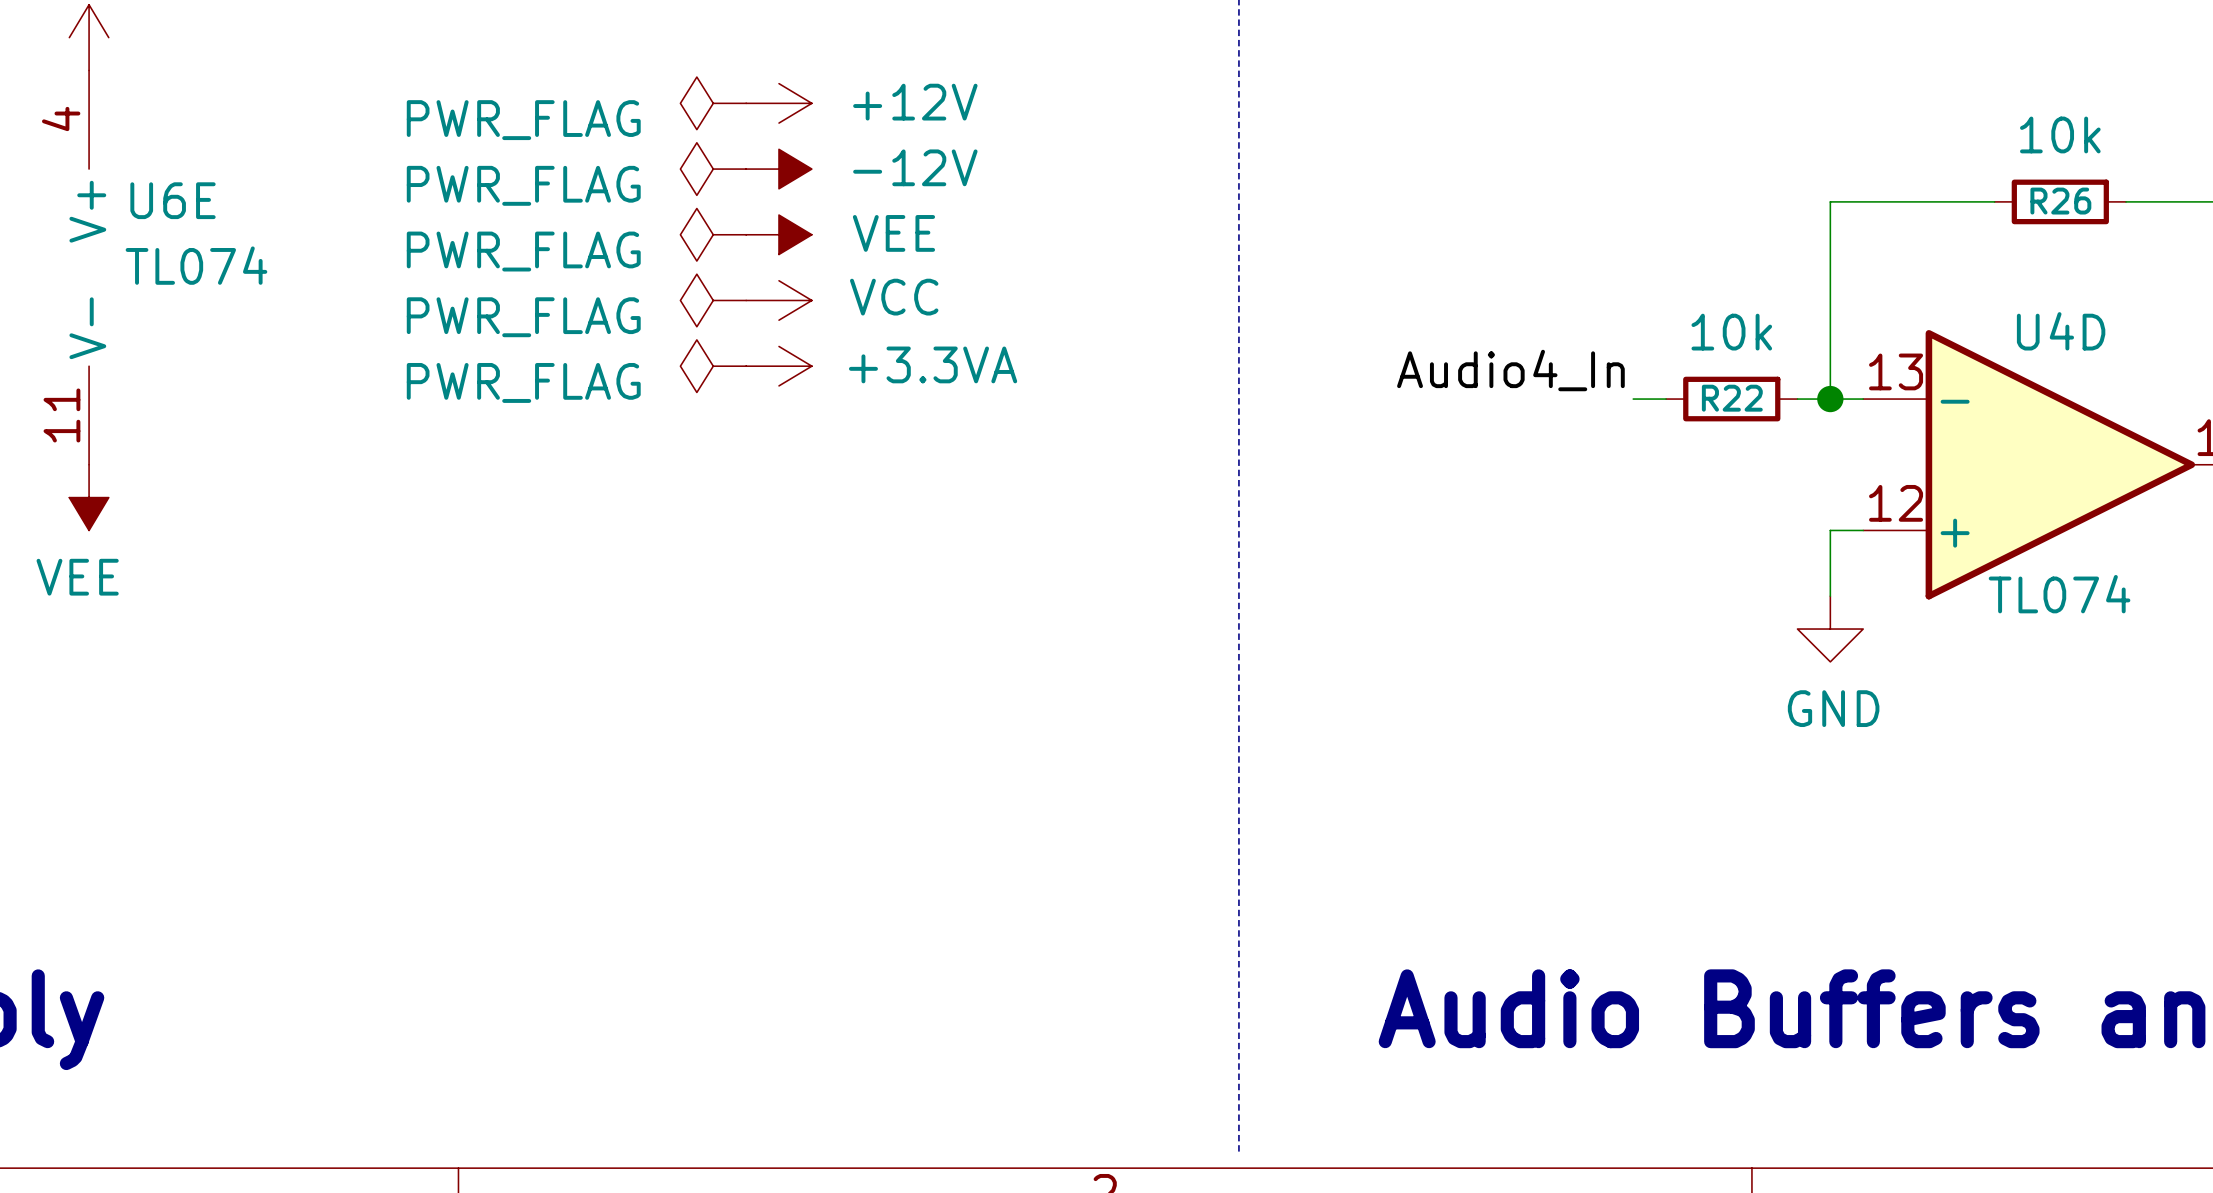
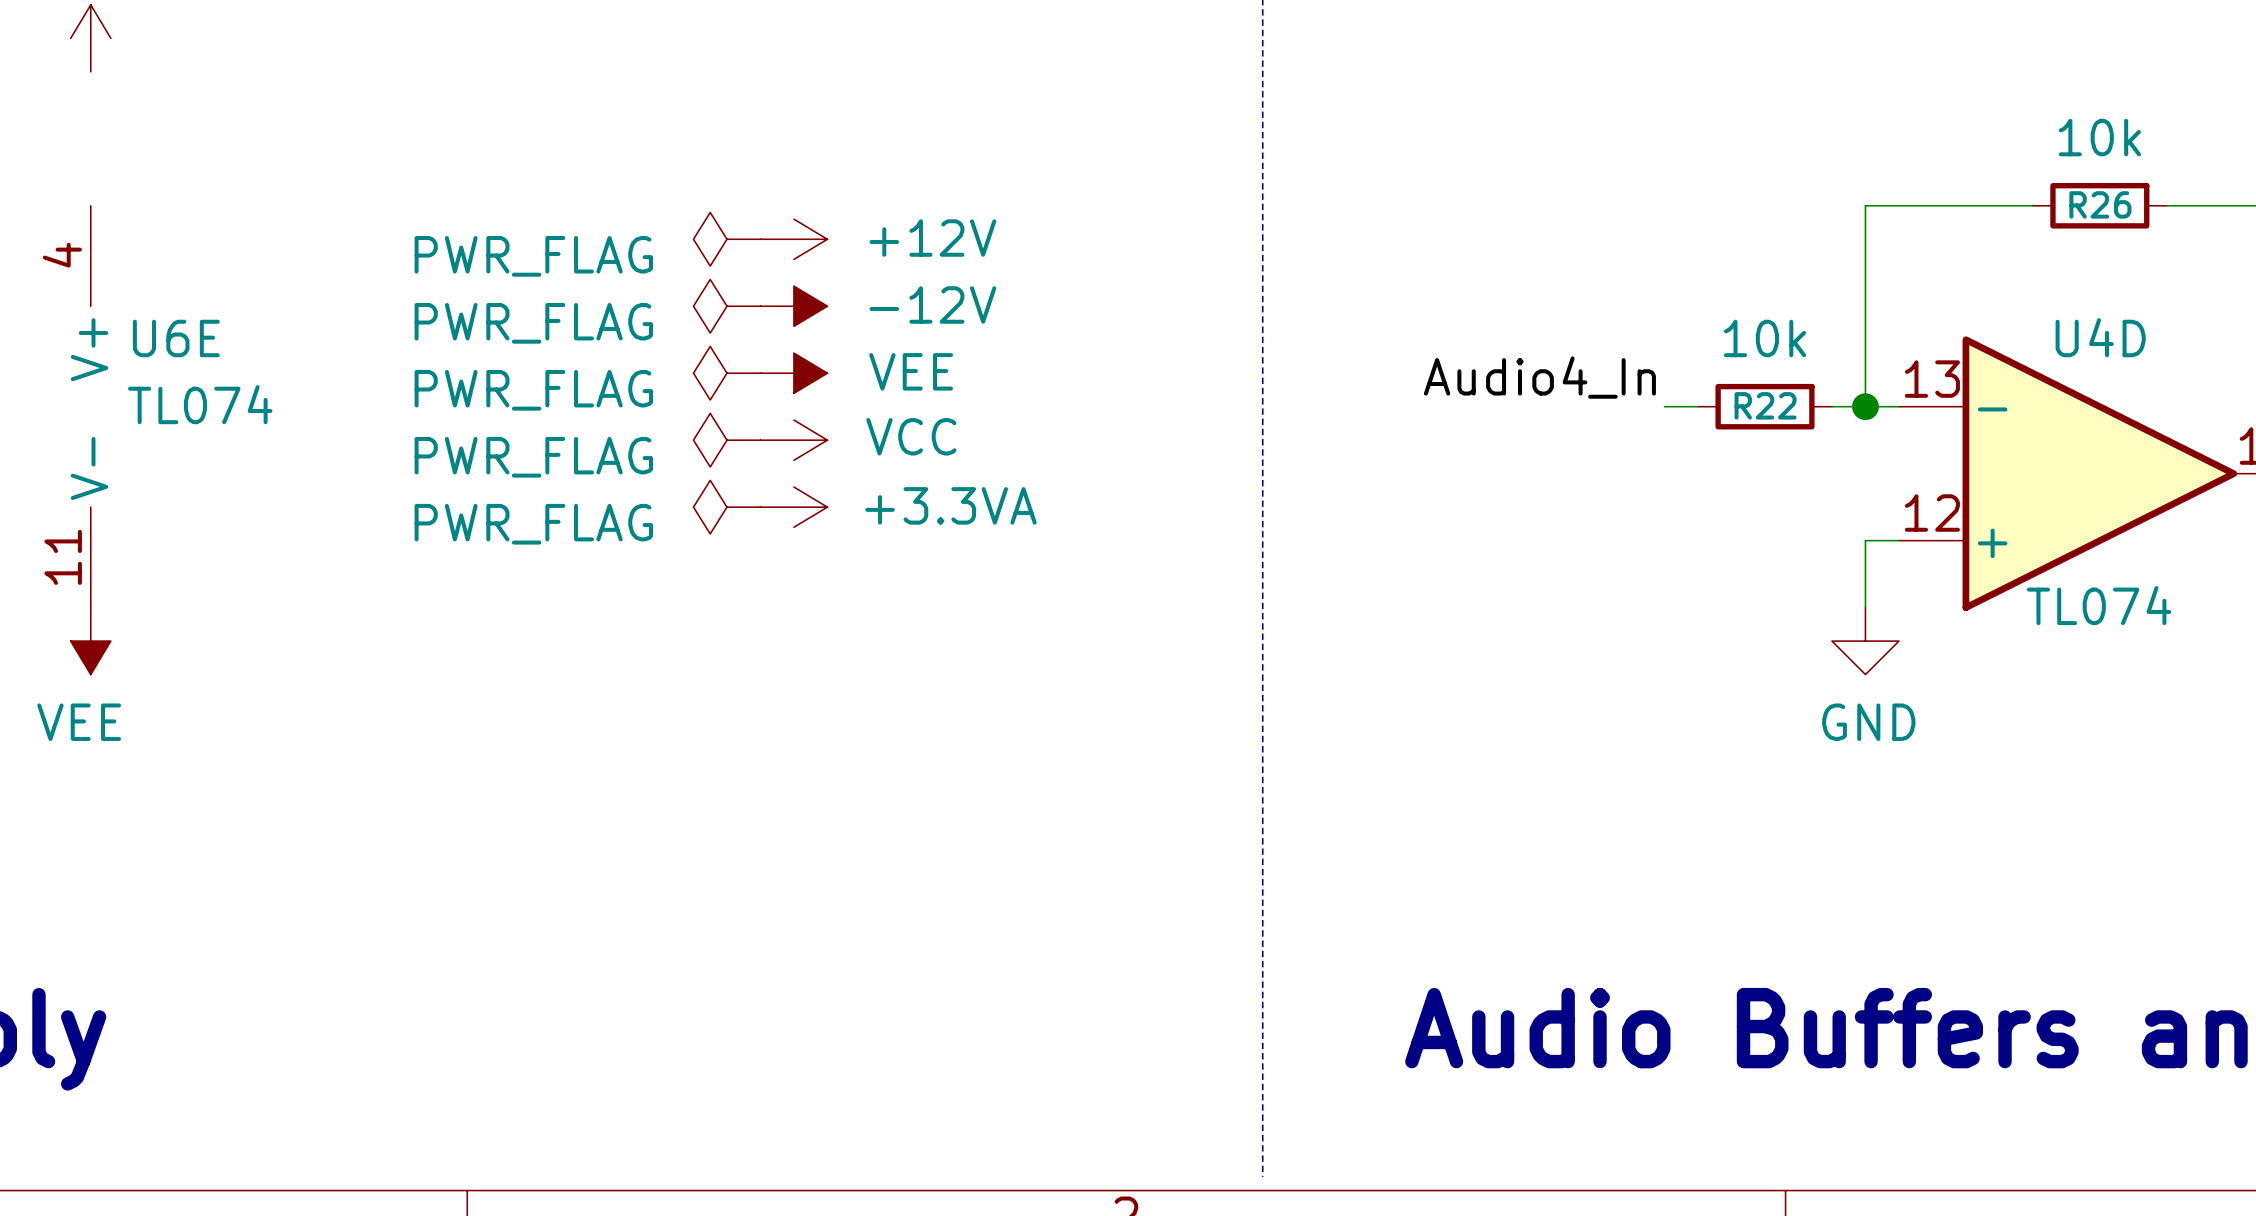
power symbol: PWR_FLAG (713, 103) -> none
power symbol: +12V (779, 103) -> none
power symbol: PWR_FLAG (713, 169) -> none
power symbol: -12V (779, 169) -> none
power symbol: VEE (779, 234) -> +12V (793, 239)
U6E position: (89, 267) -> (90, 406)
power symbol: VCC (779, 300) -> -12V (793, 306)
power symbol: +3.3VA (779, 366) -> VEE (793, 373)
power symbol: none -> PWR_FLAG (726, 440)
power symbol: none -> VCC (793, 440)
power symbol position: VEE (89, 497) -> VEE (90, 641)
power symbol: none -> PWR_FLAG (726, 507)
power symbol: none -> +3.3VA (793, 507)

